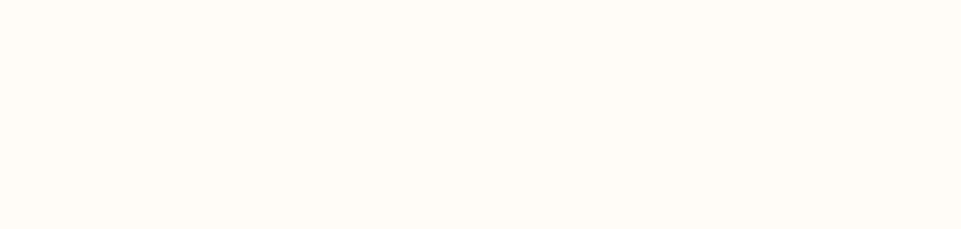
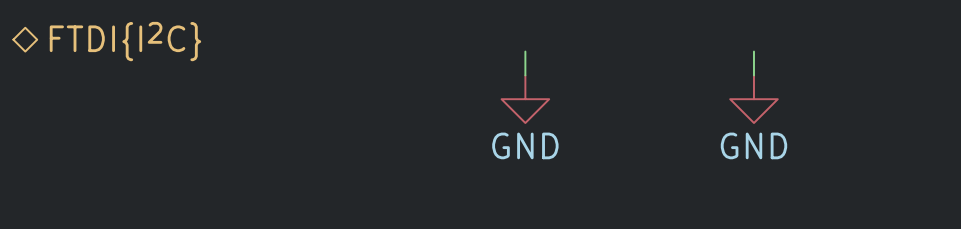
hierarchical label: none -> FTDI{I2C} (125, 41)
wire: none -> (525, 51) (525, 75)
wire: none -> (753, 51) (753, 75)
power symbol: none -> GND (525, 99)
power symbol: none -> GND (753, 99)

